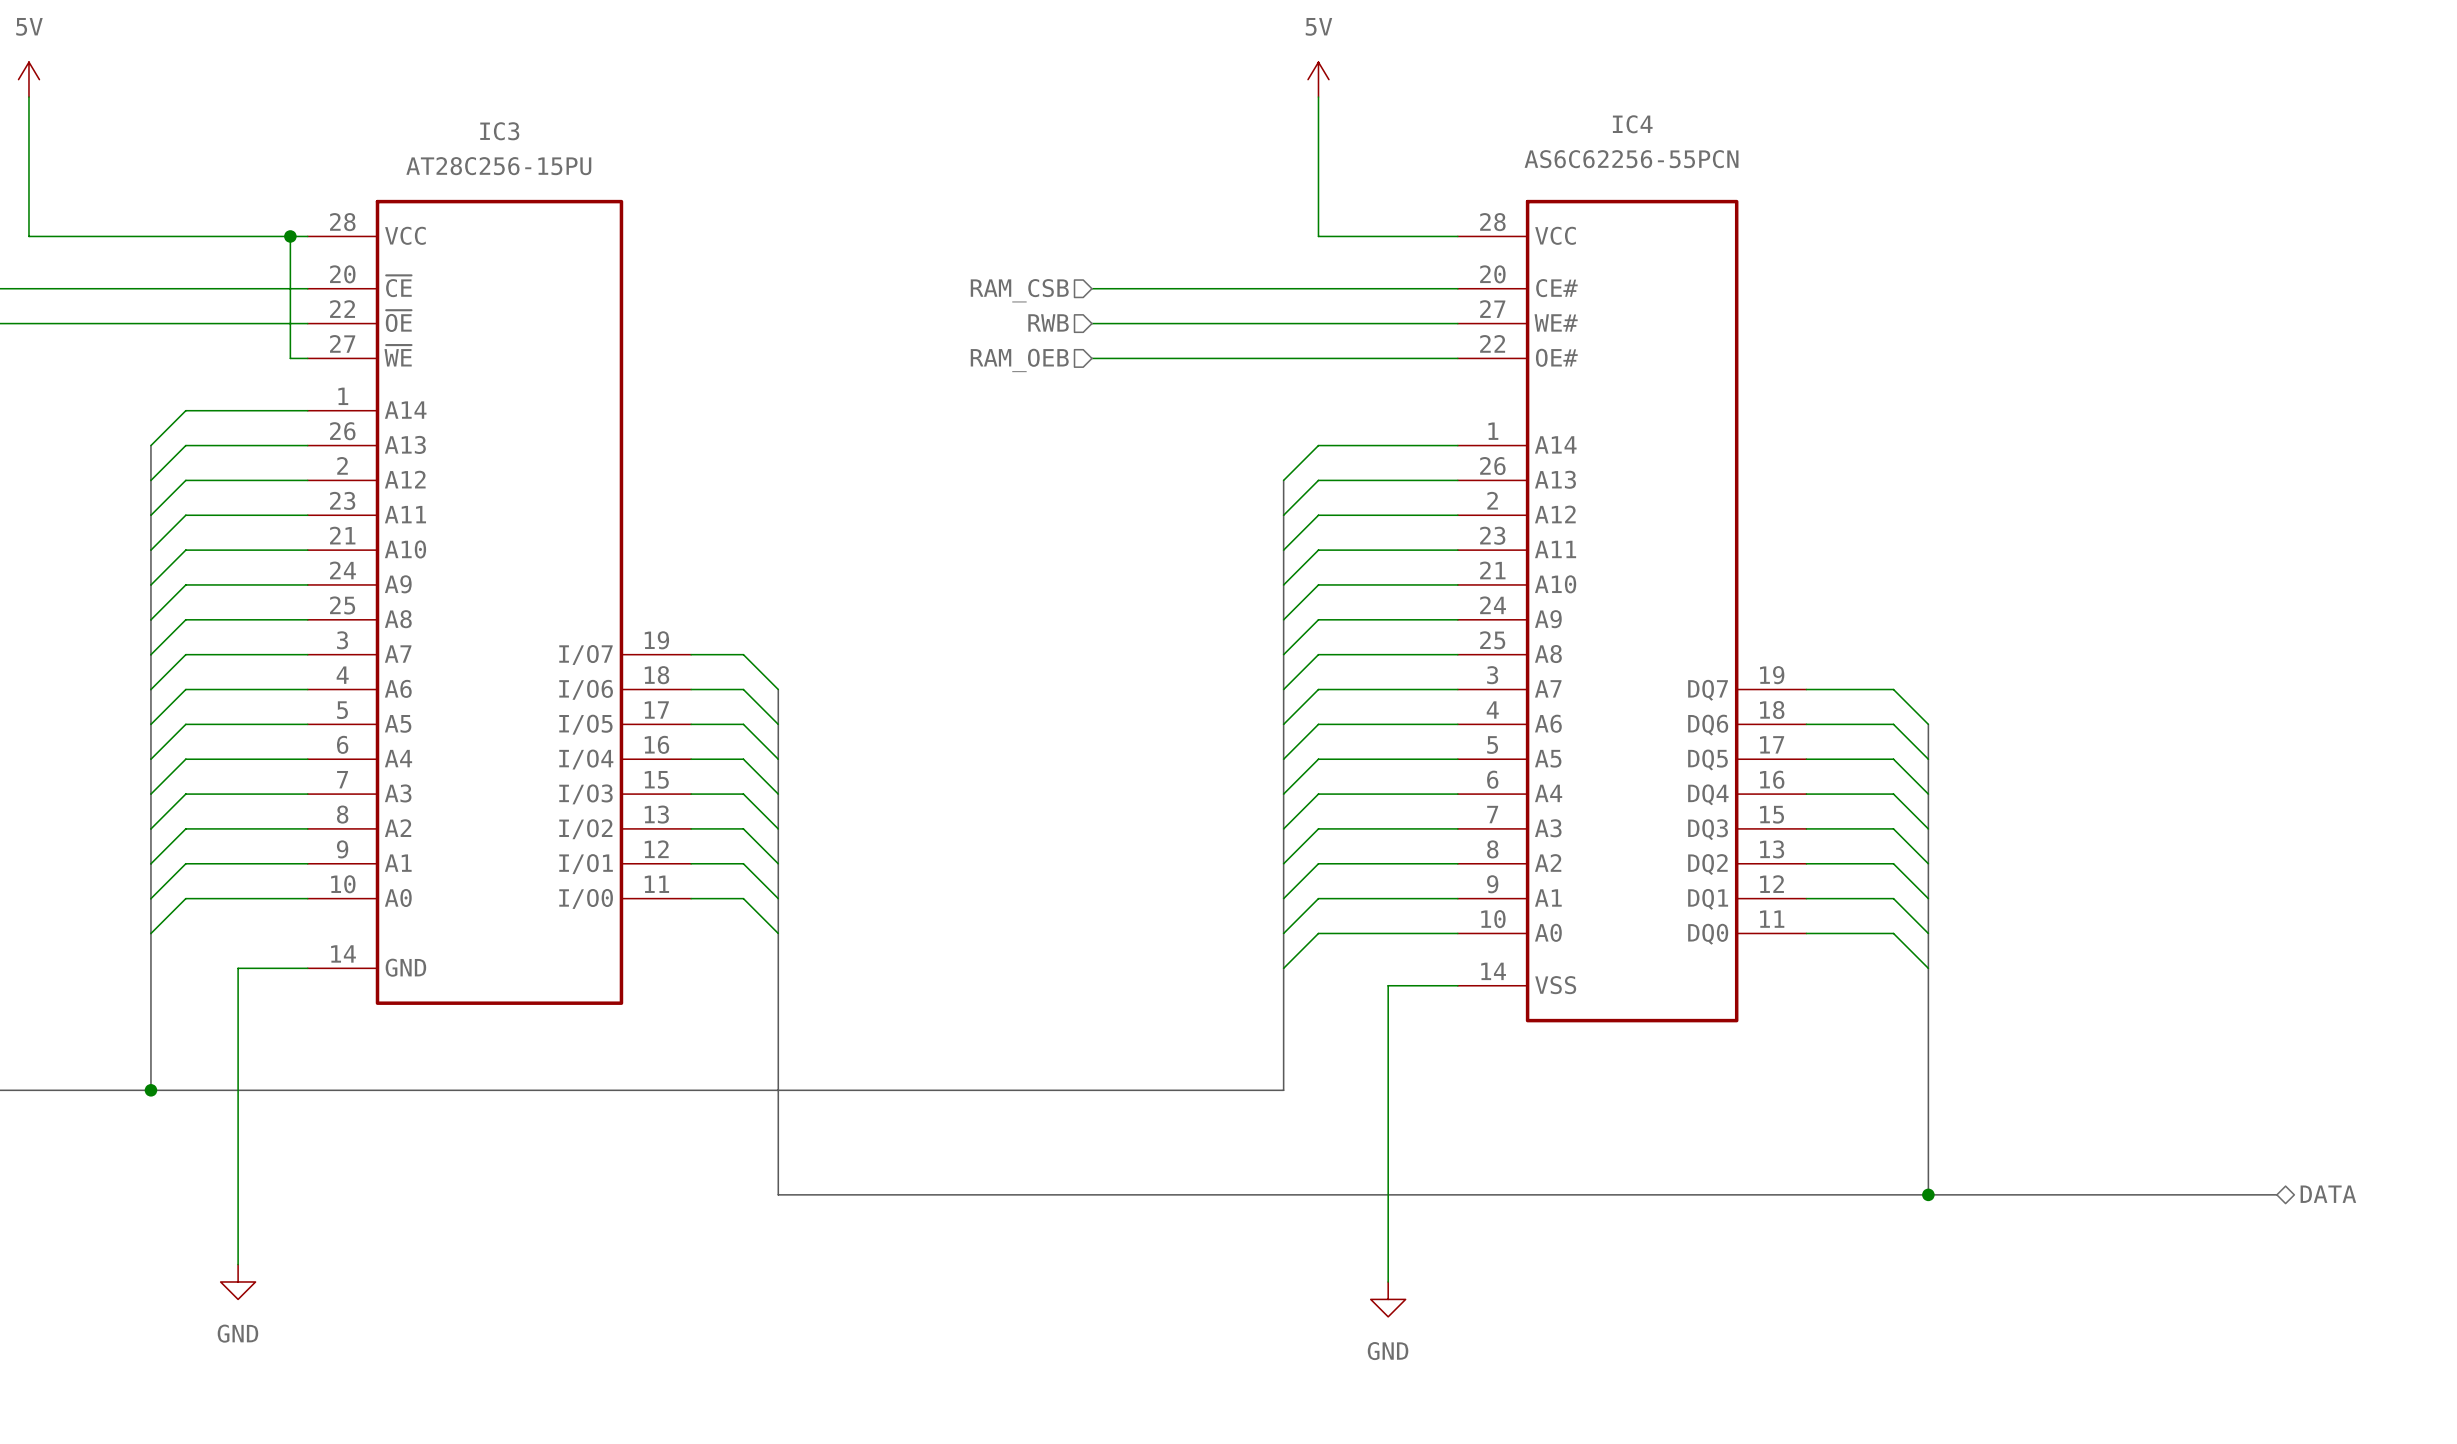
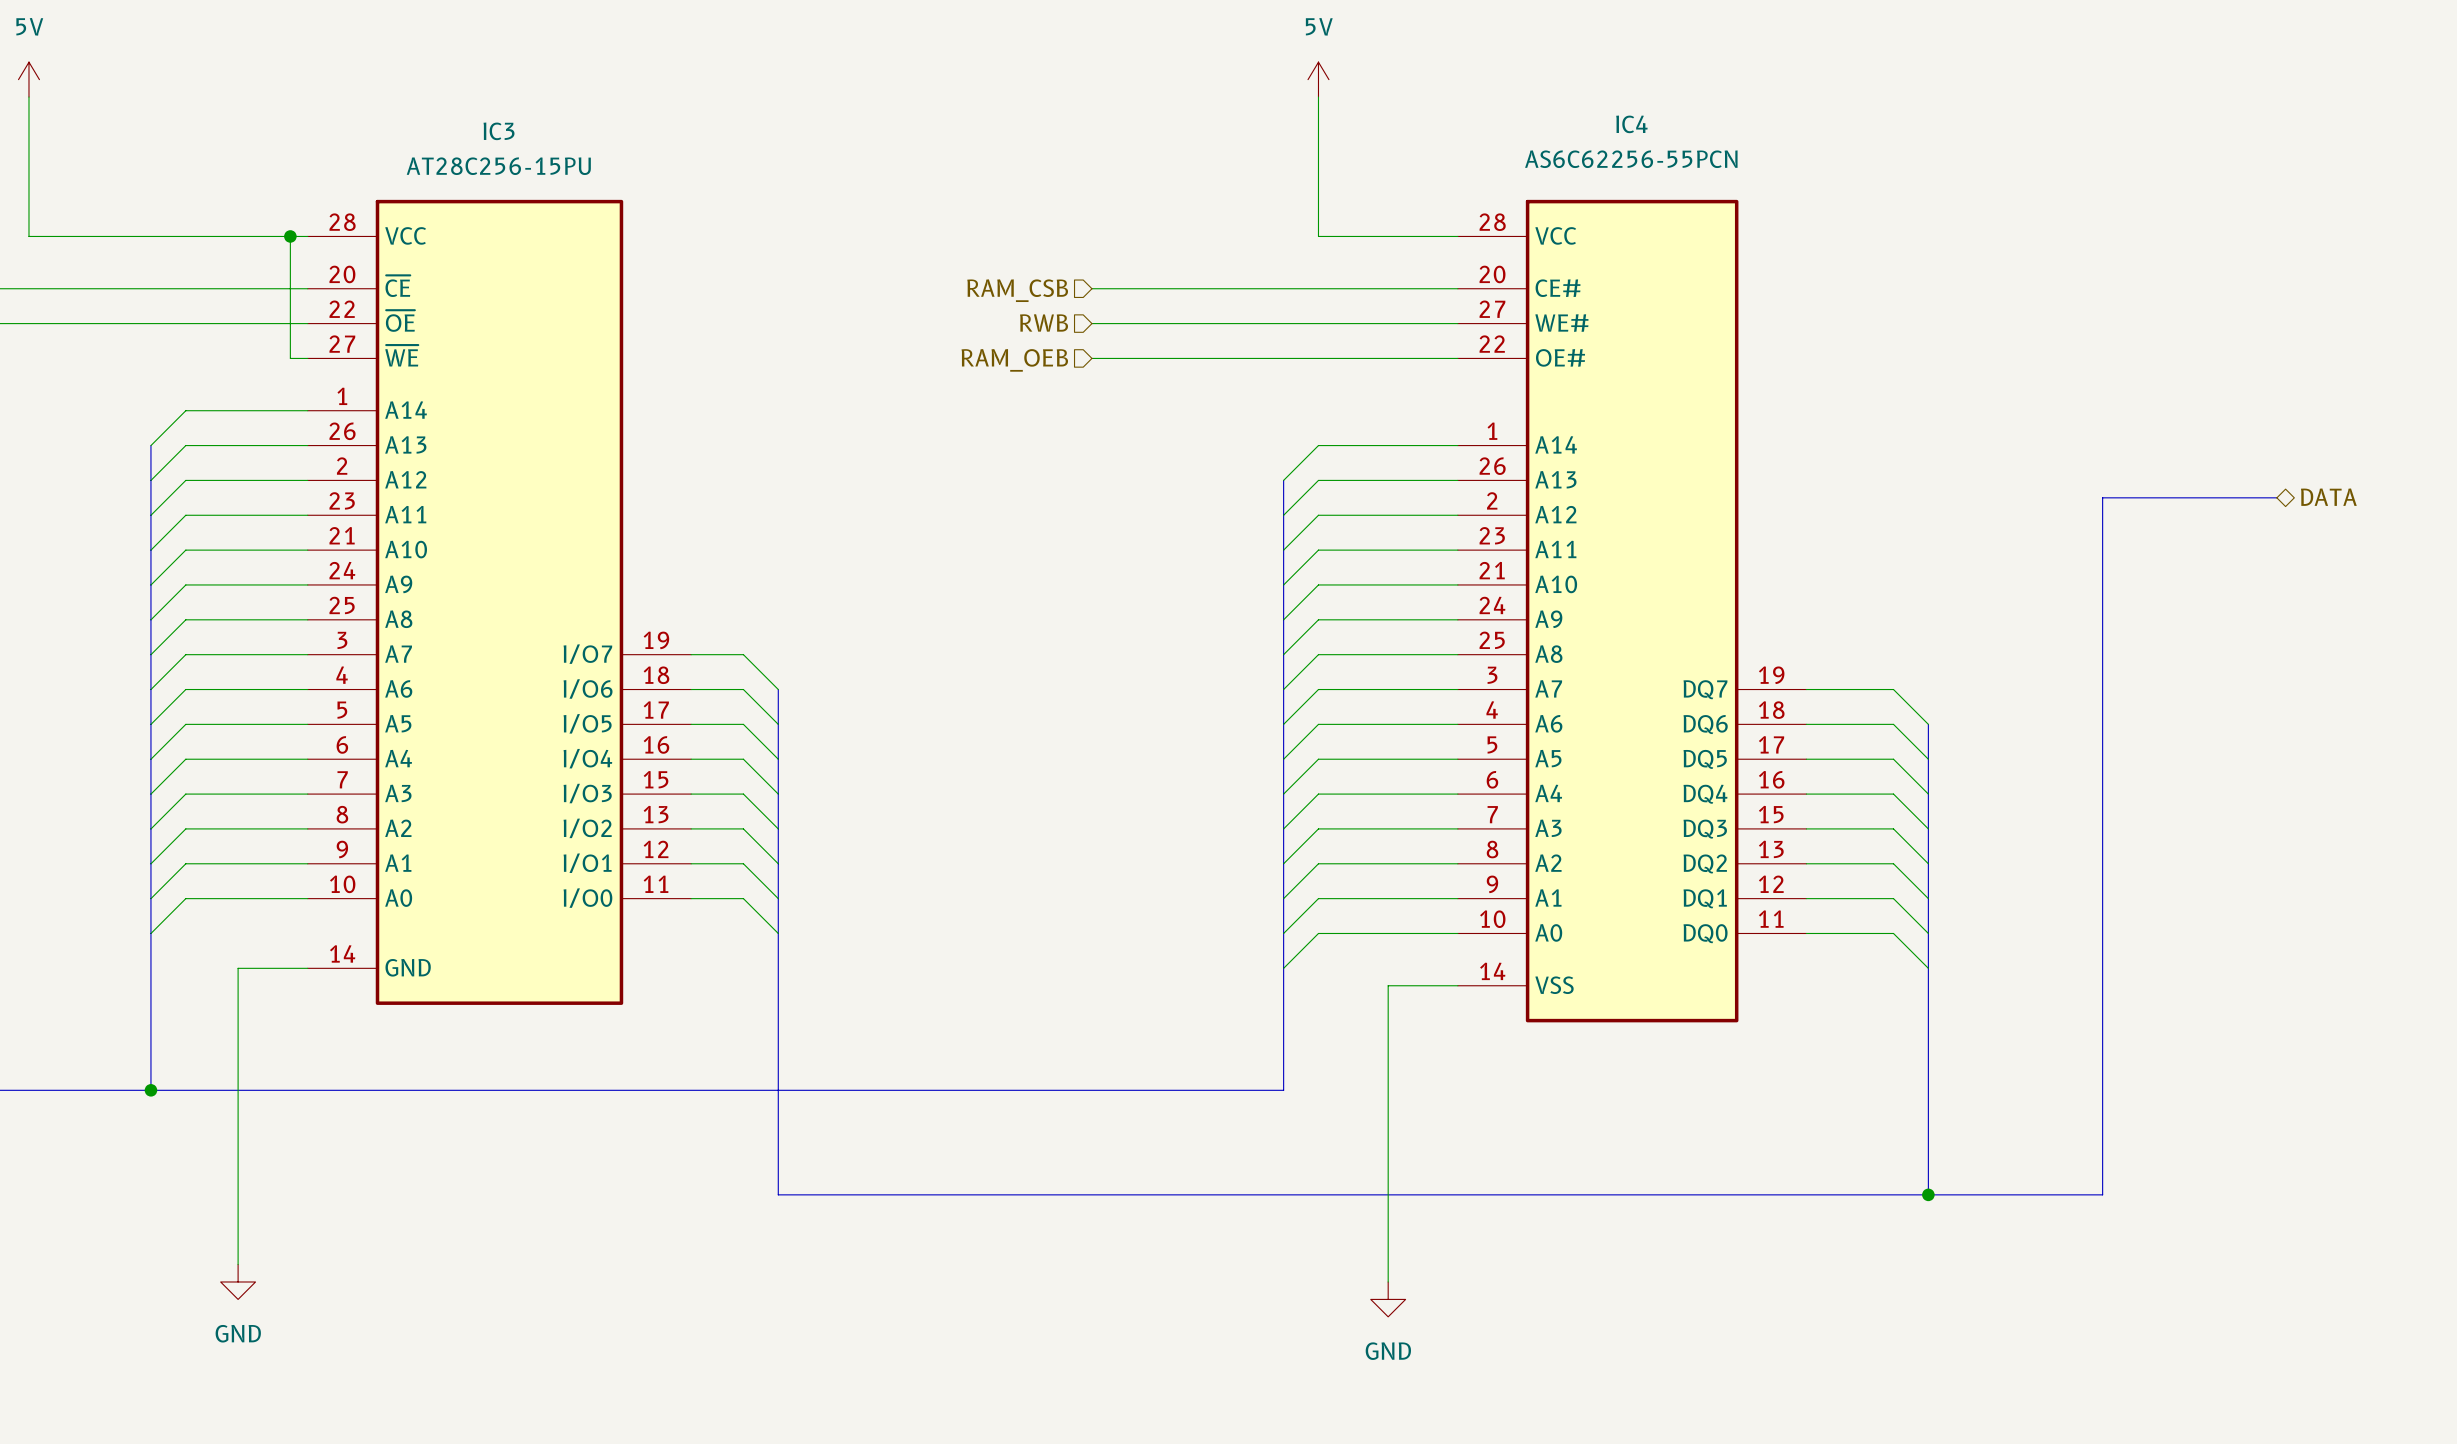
hierarchical label: none -> DATA (2328, 497)
bus: (2102, 1194) (2276, 1194) -> (2102, 1194) (2102, 497) (2276, 497)
hierarchical label: DATA (2328, 1194) -> none

